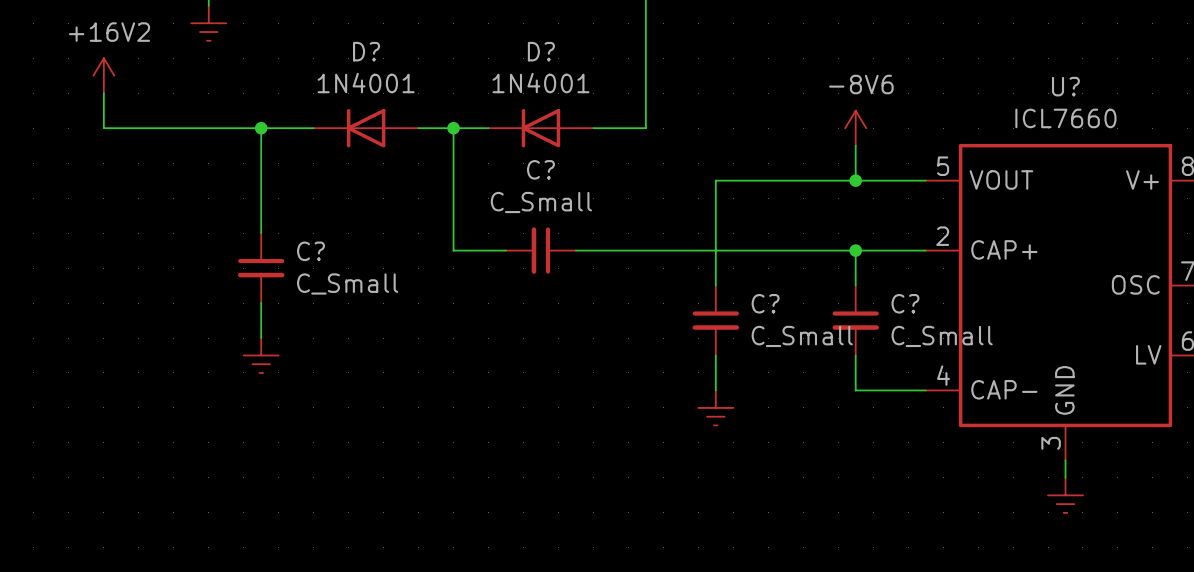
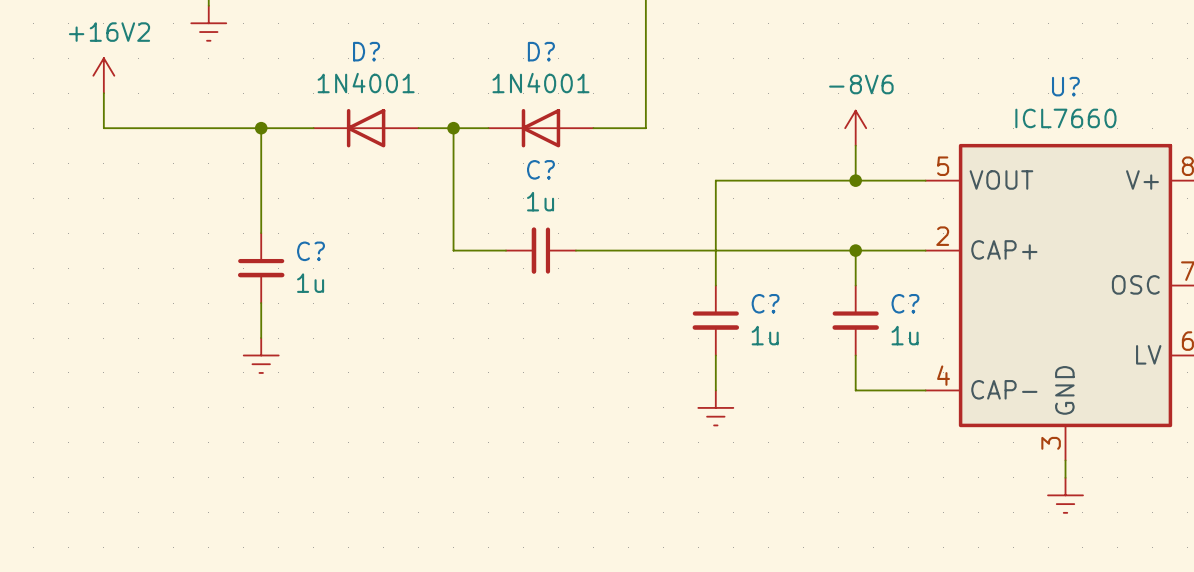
C? value: C_Small (541, 202) -> 1u (540, 201)
C? value: C_Small (347, 283) -> 1u (310, 283)
C? value: C_Small (802, 336) -> 1u (765, 335)
C? value: C_Small (942, 336) -> 1u (905, 335)

